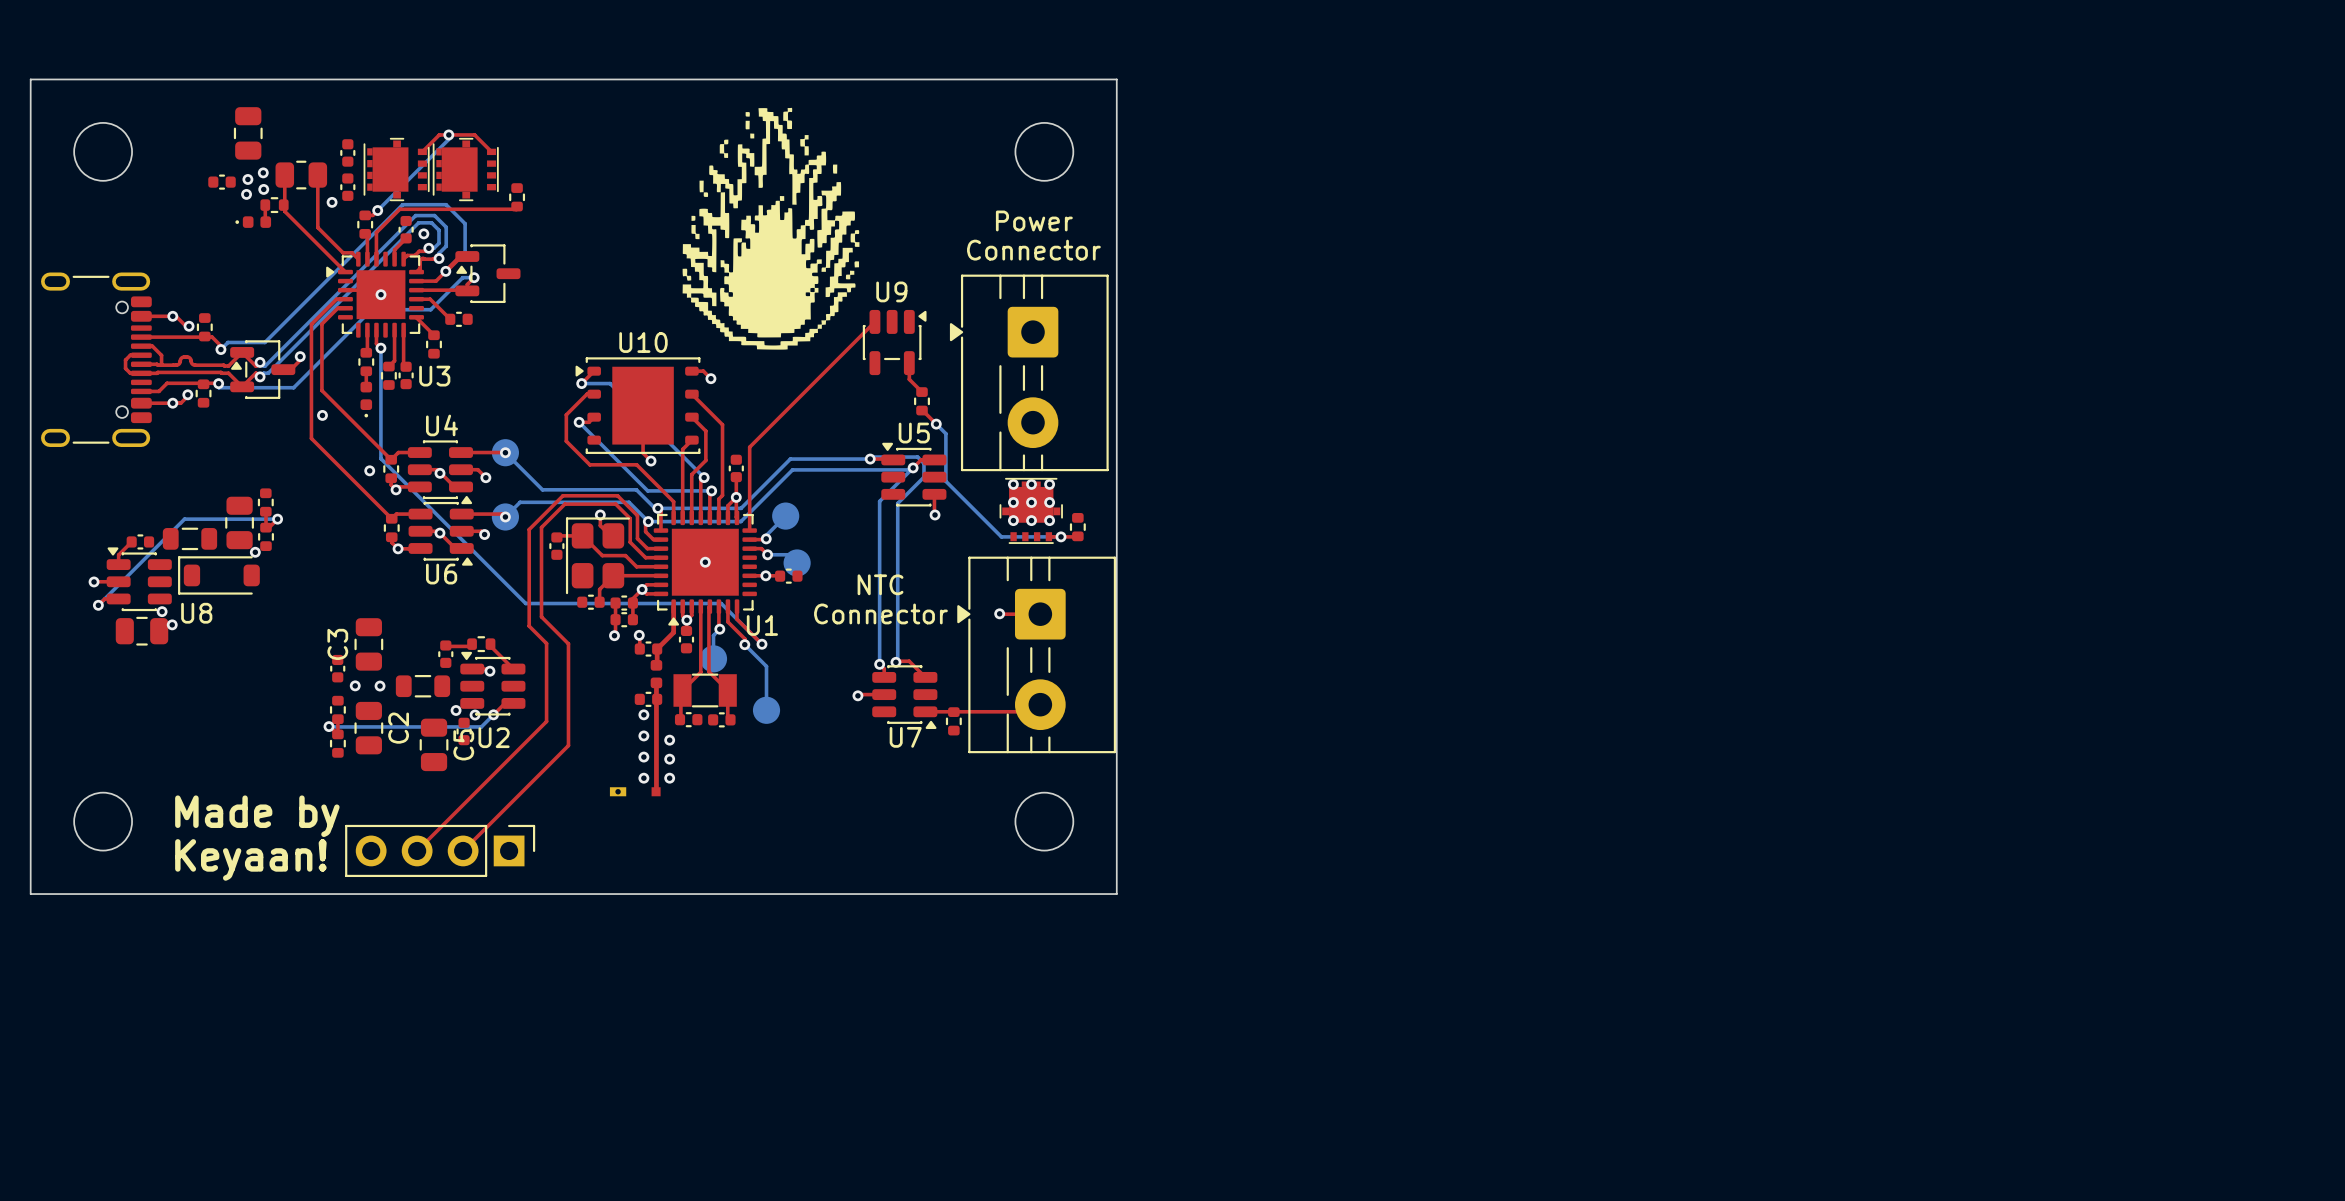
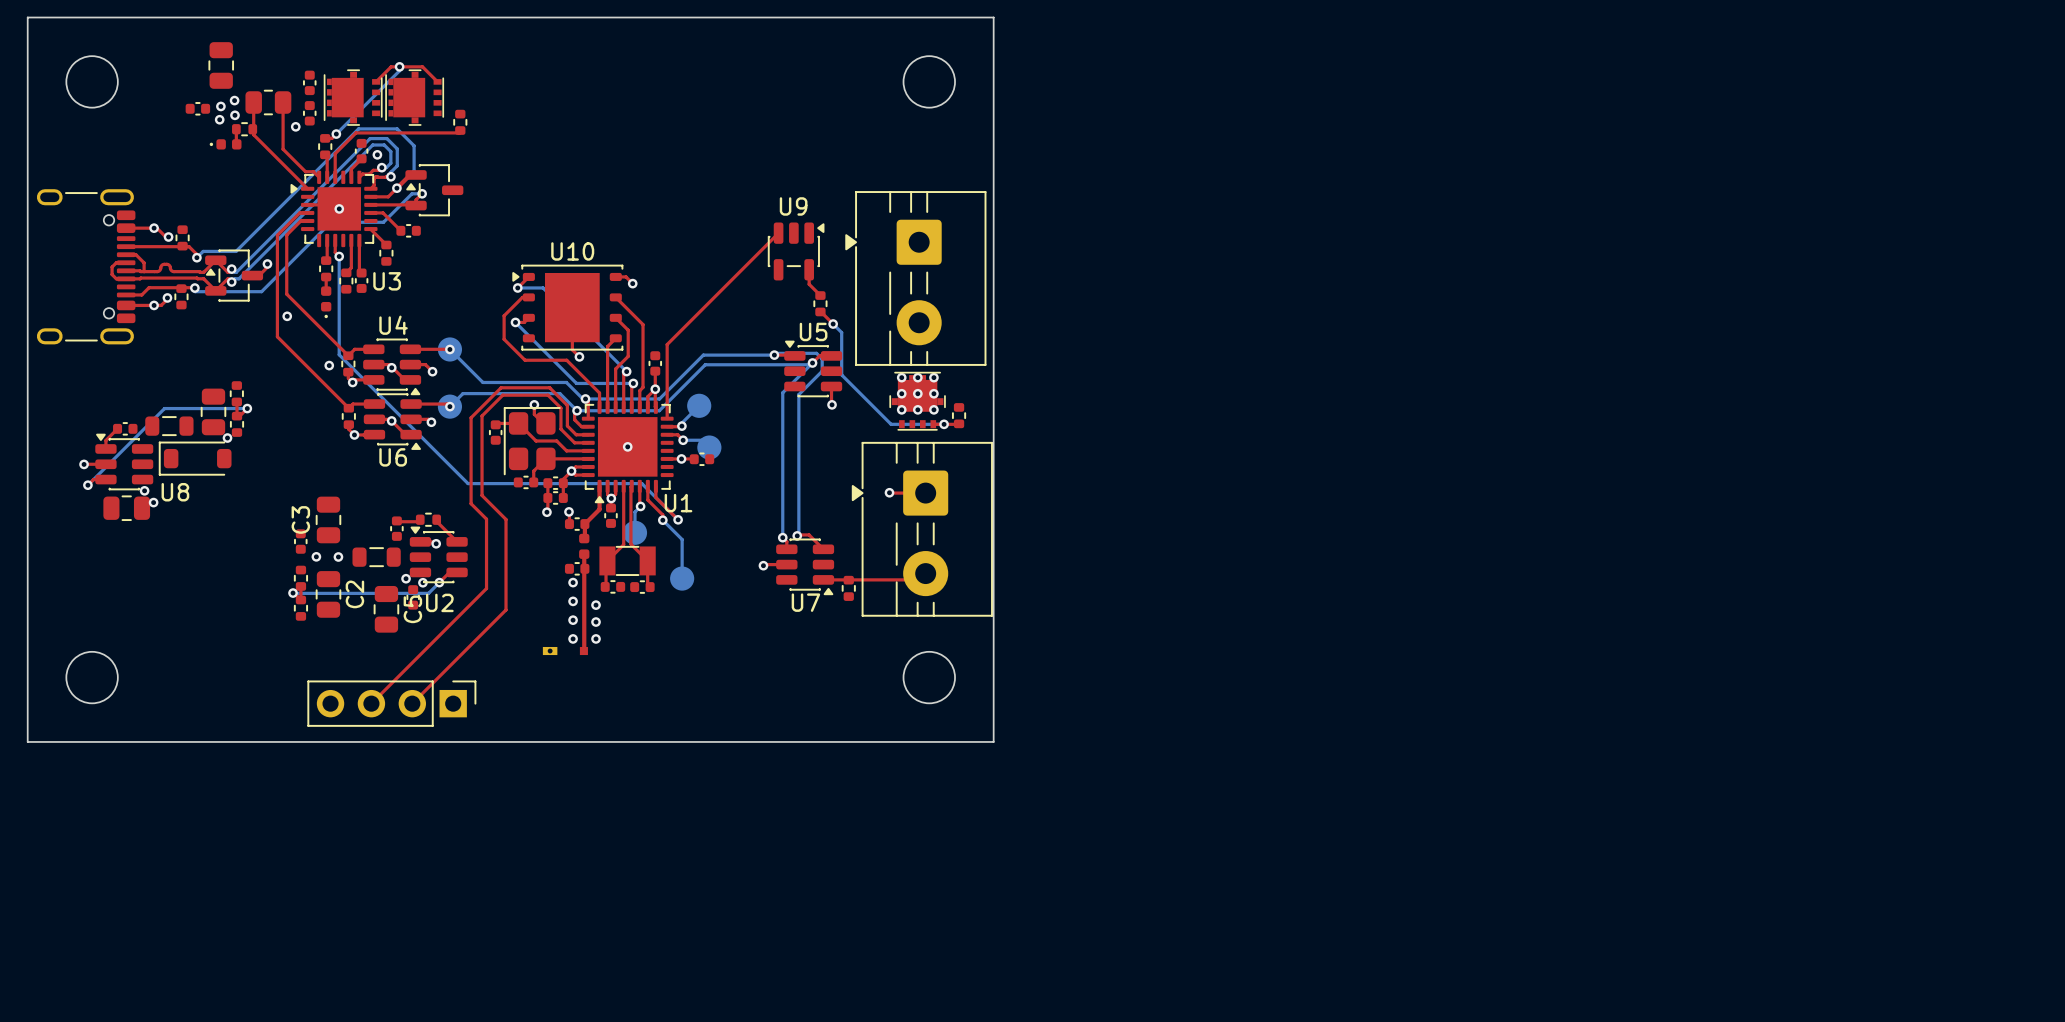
drawing: [682, 107, 860, 350] -> none
text: Power (1034, 220) -> none
text: Connector (1033, 250) -> none
text: NTC (880, 584) -> none
text: Connector (880, 613) -> none
text: Made by (257, 816) -> none
text: Keyaan! (250, 859) -> none

